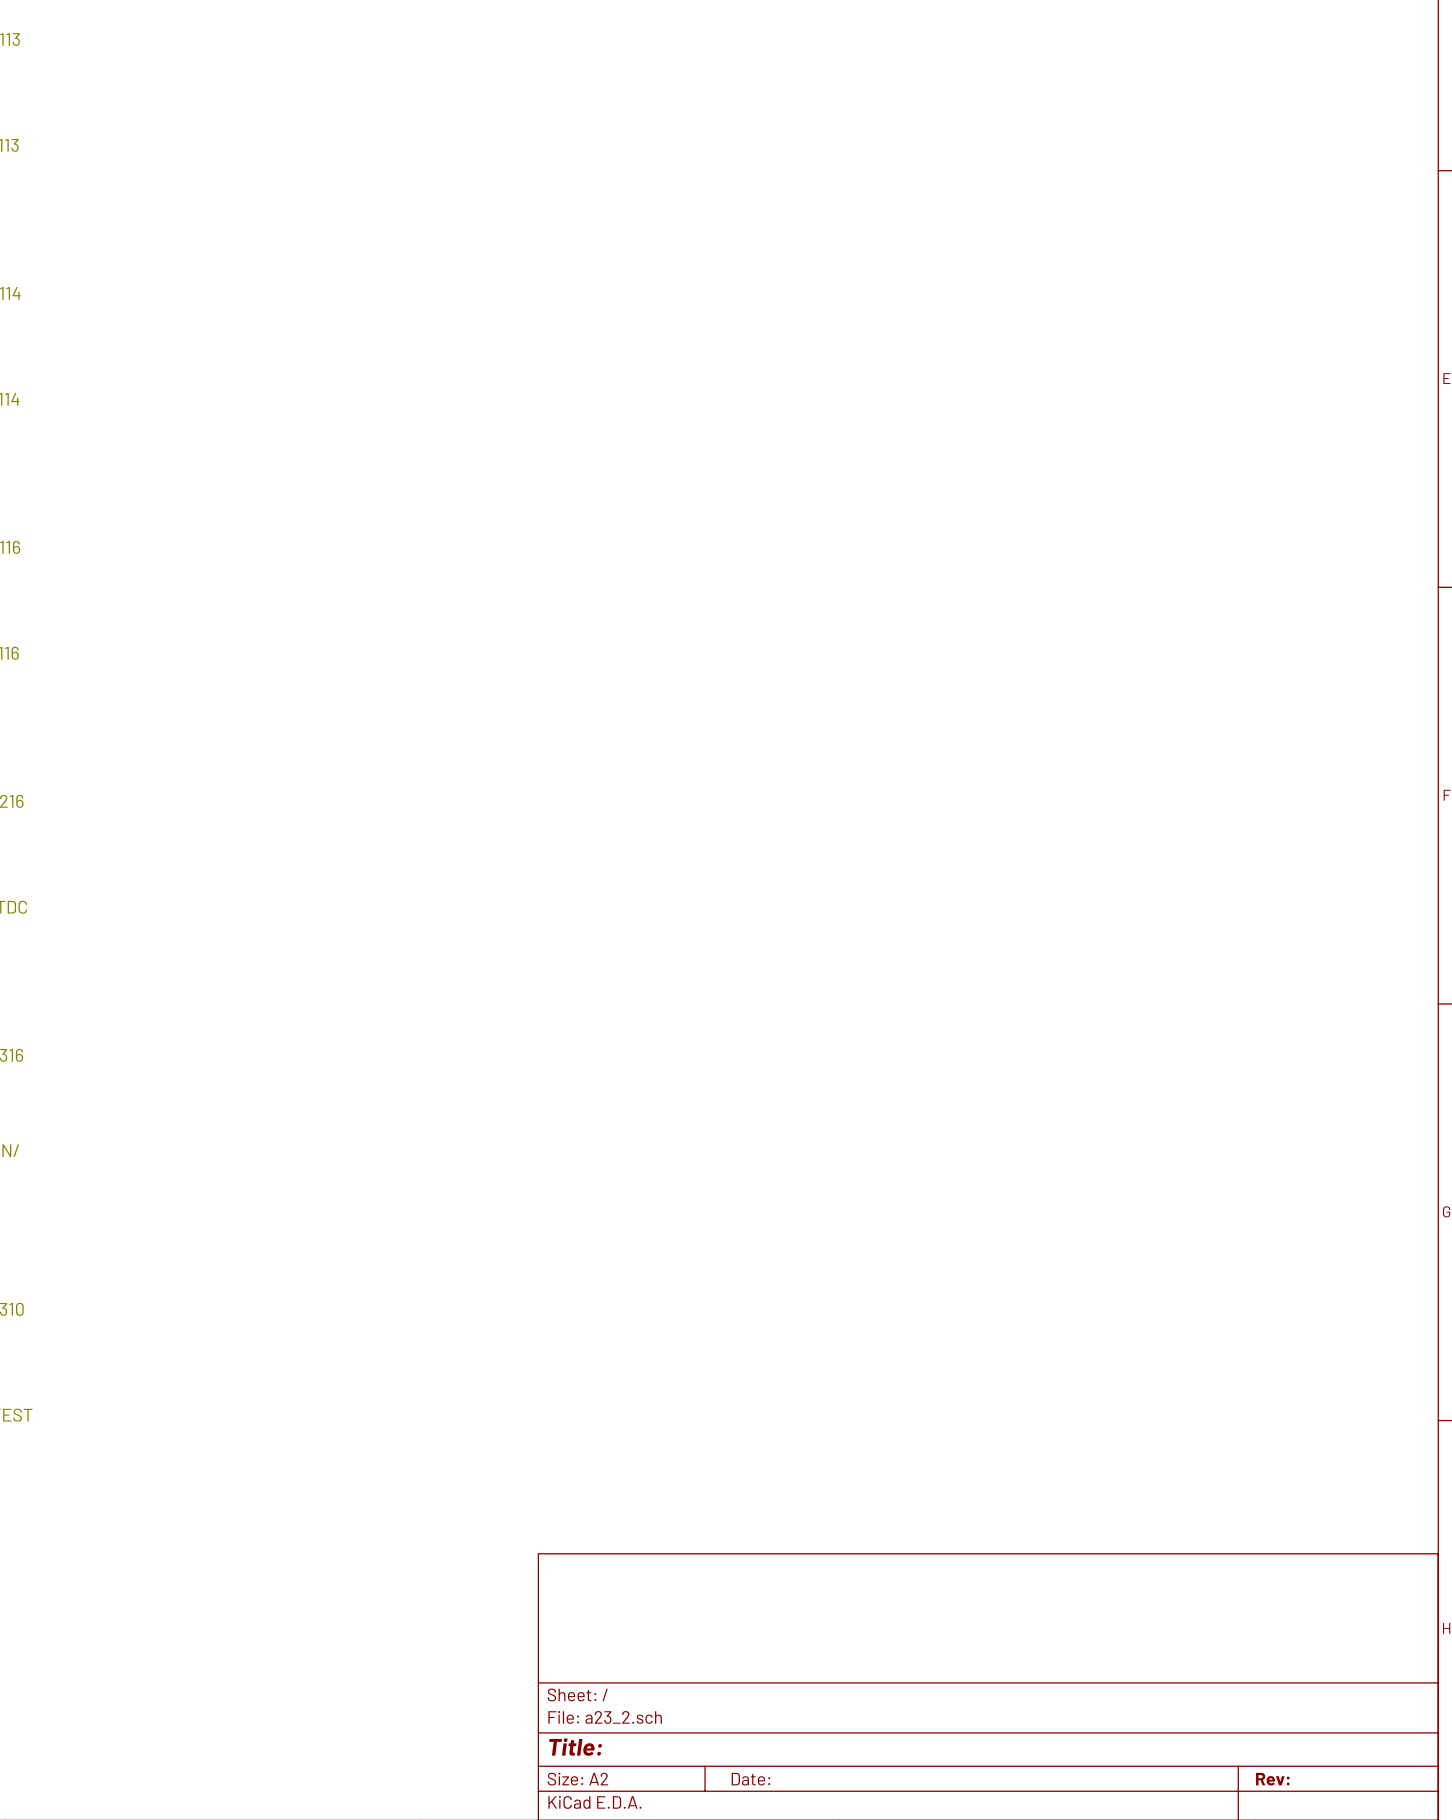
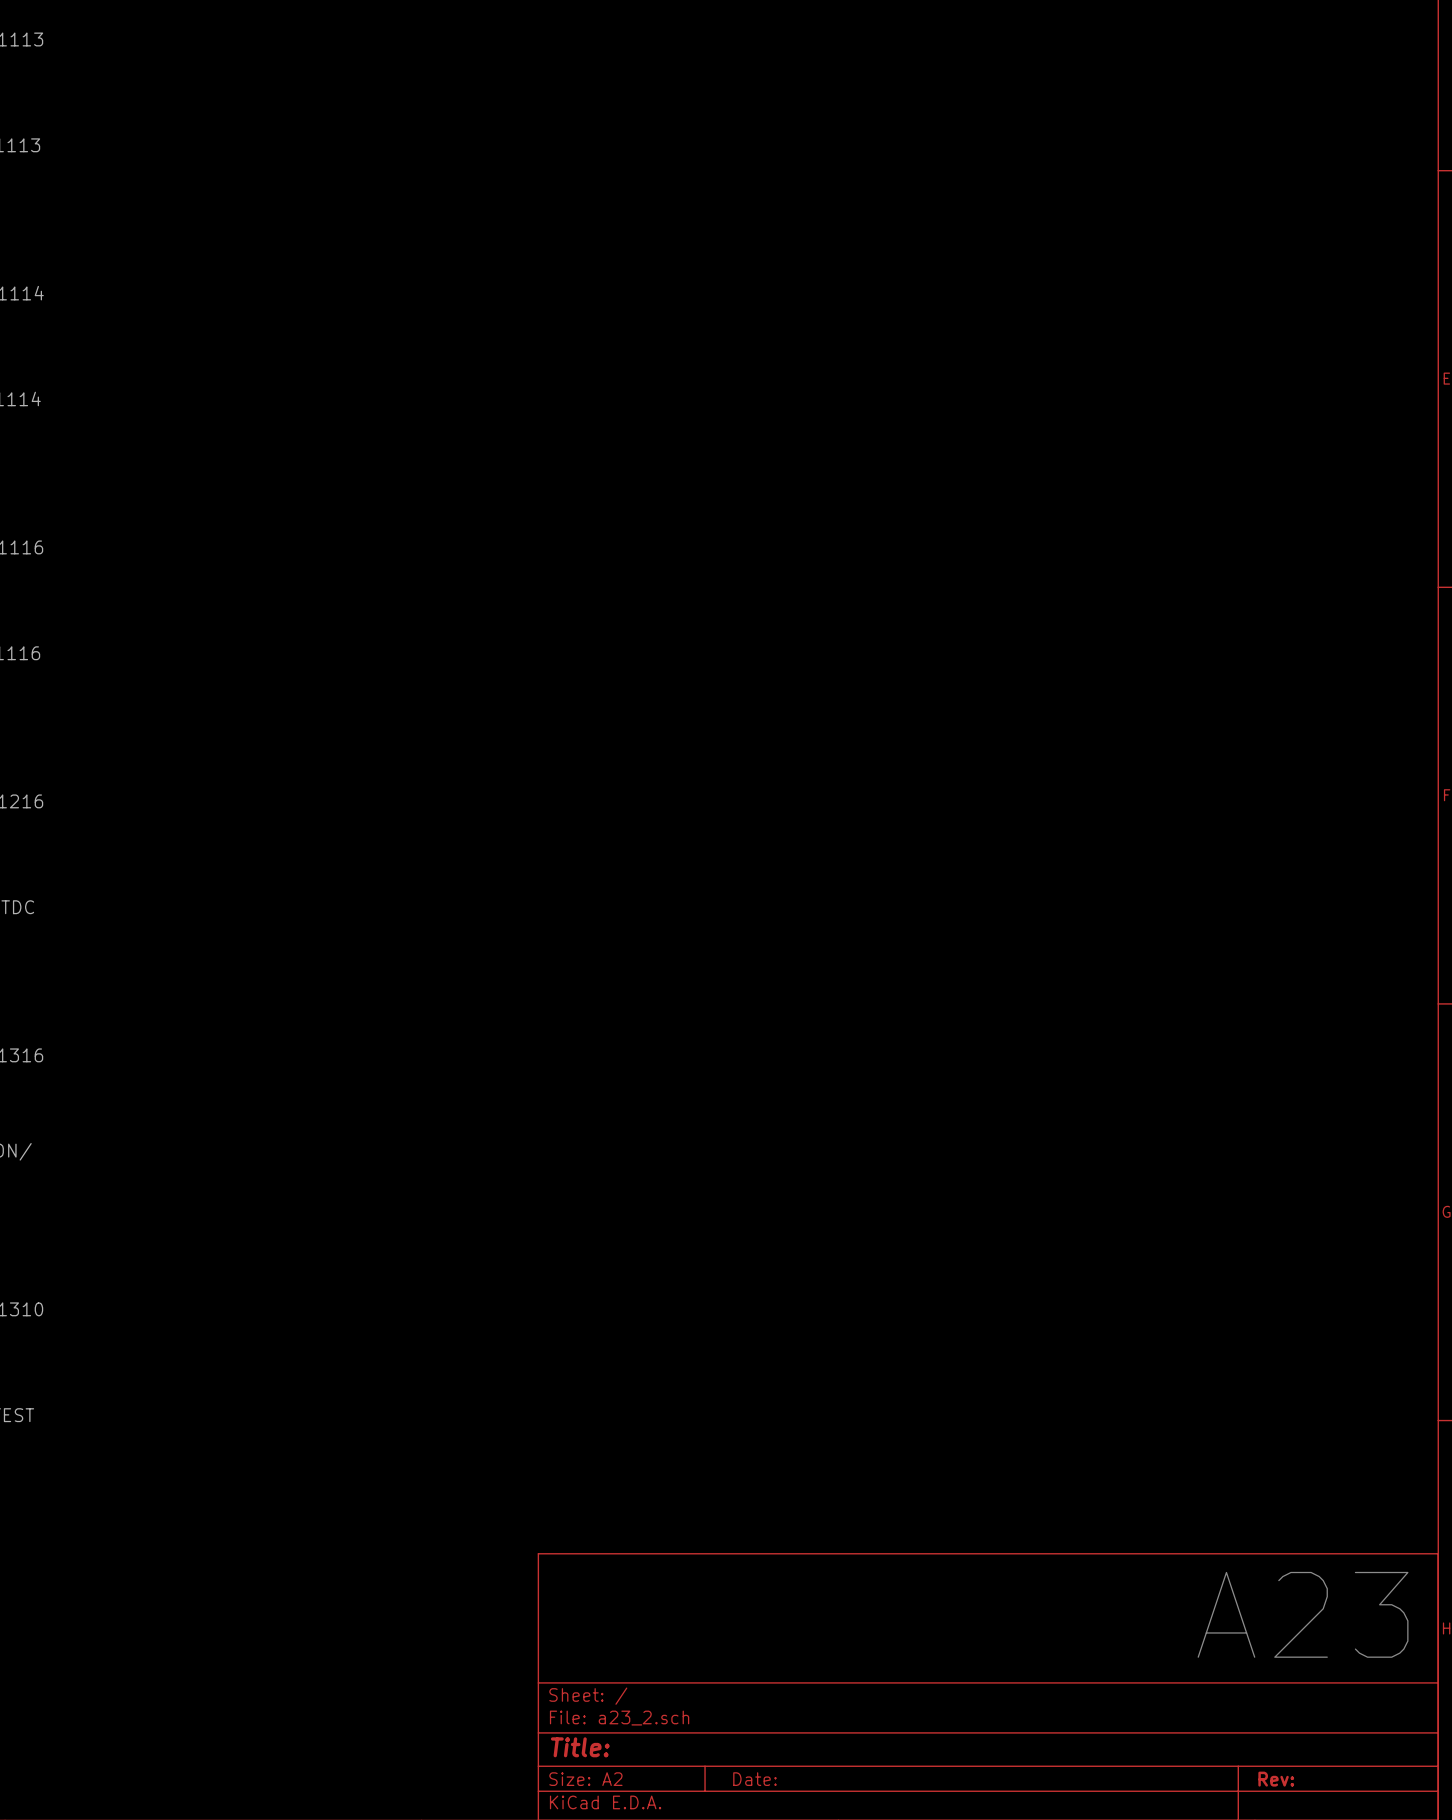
text: none -> A23 (1303, 1614)

